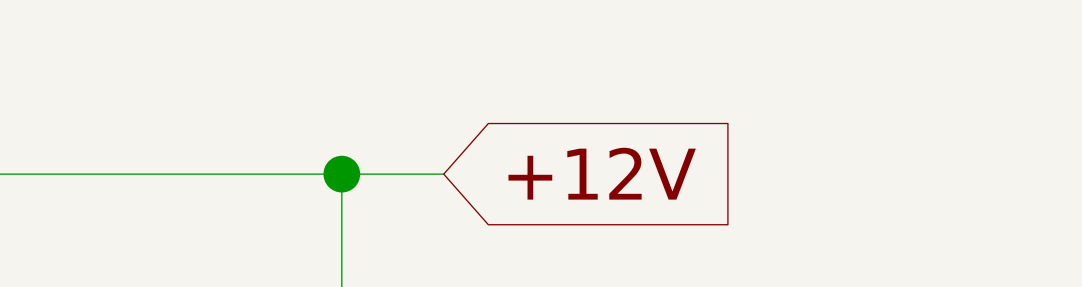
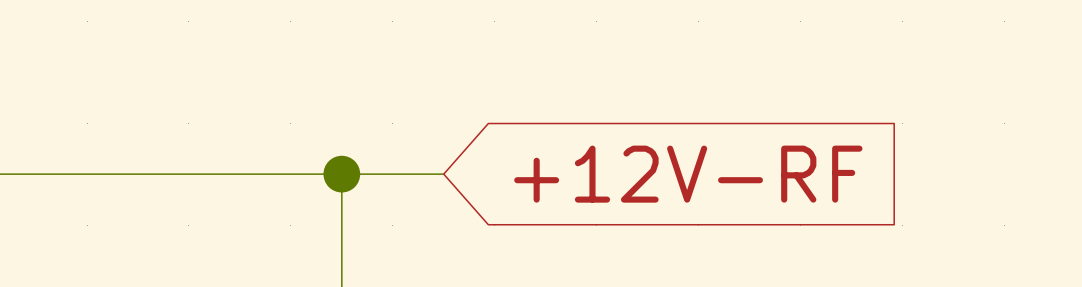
global label: +12V (602, 173) -> +12V-RF (688, 174)

